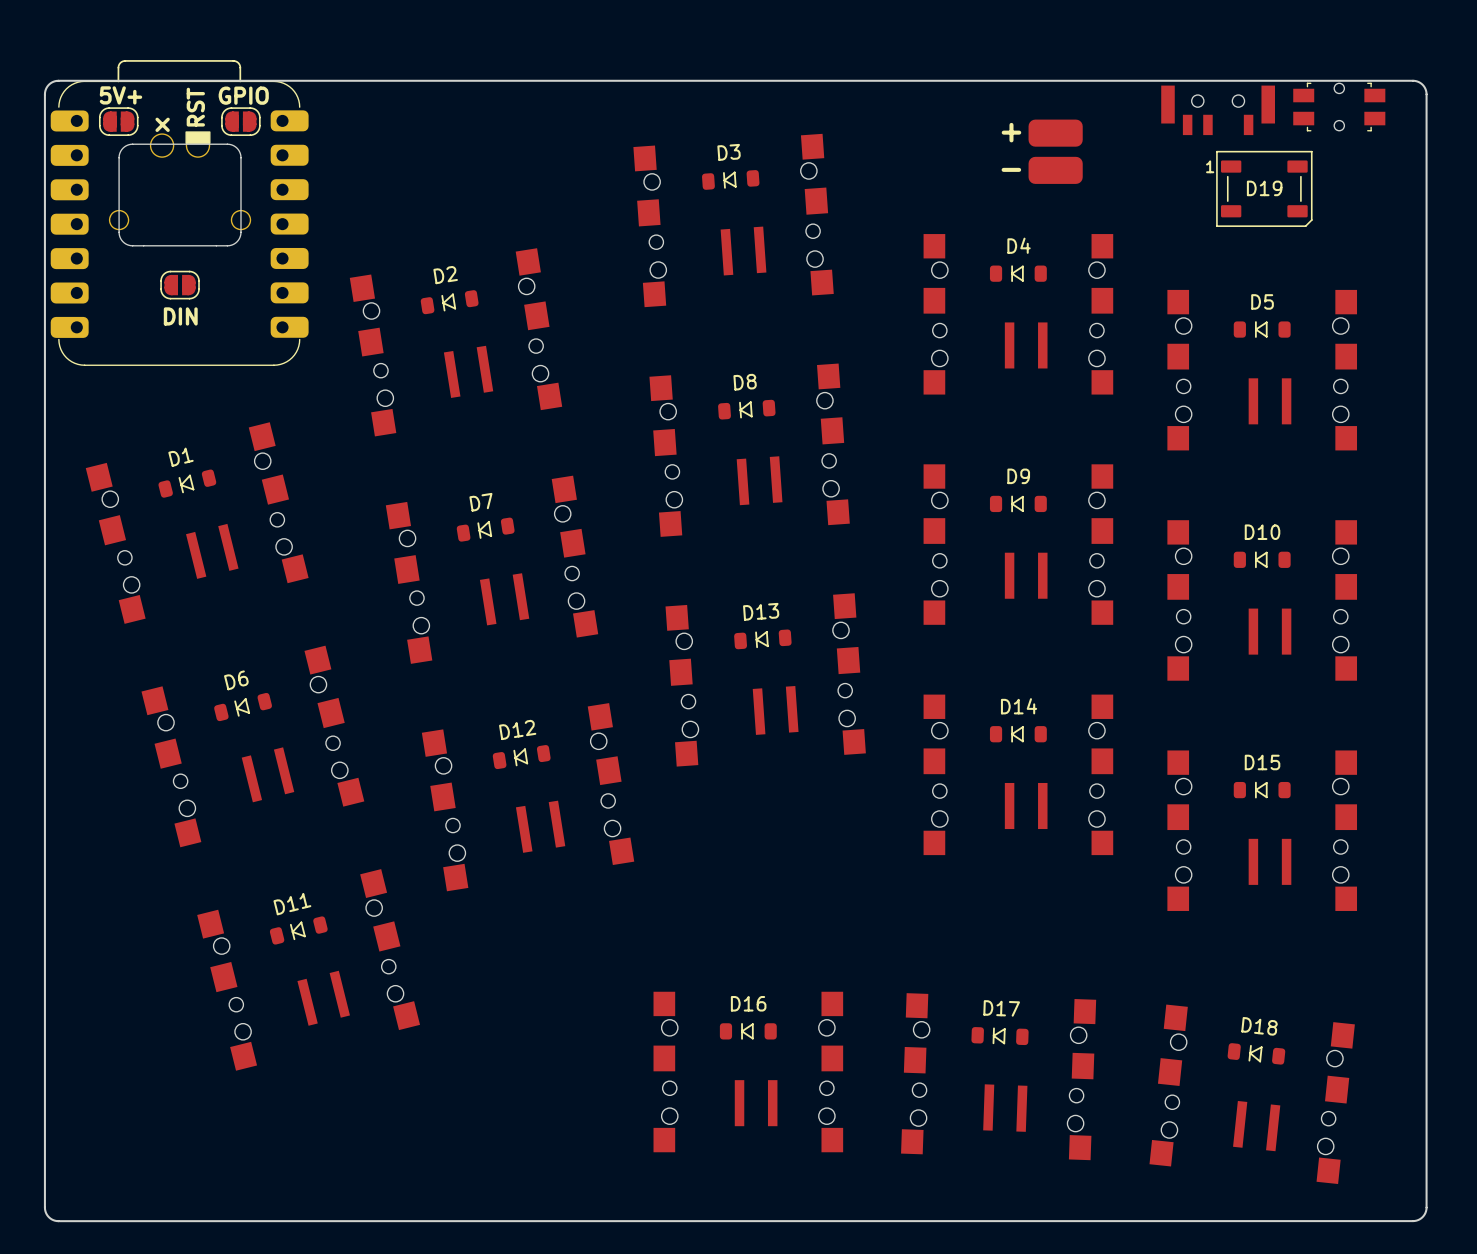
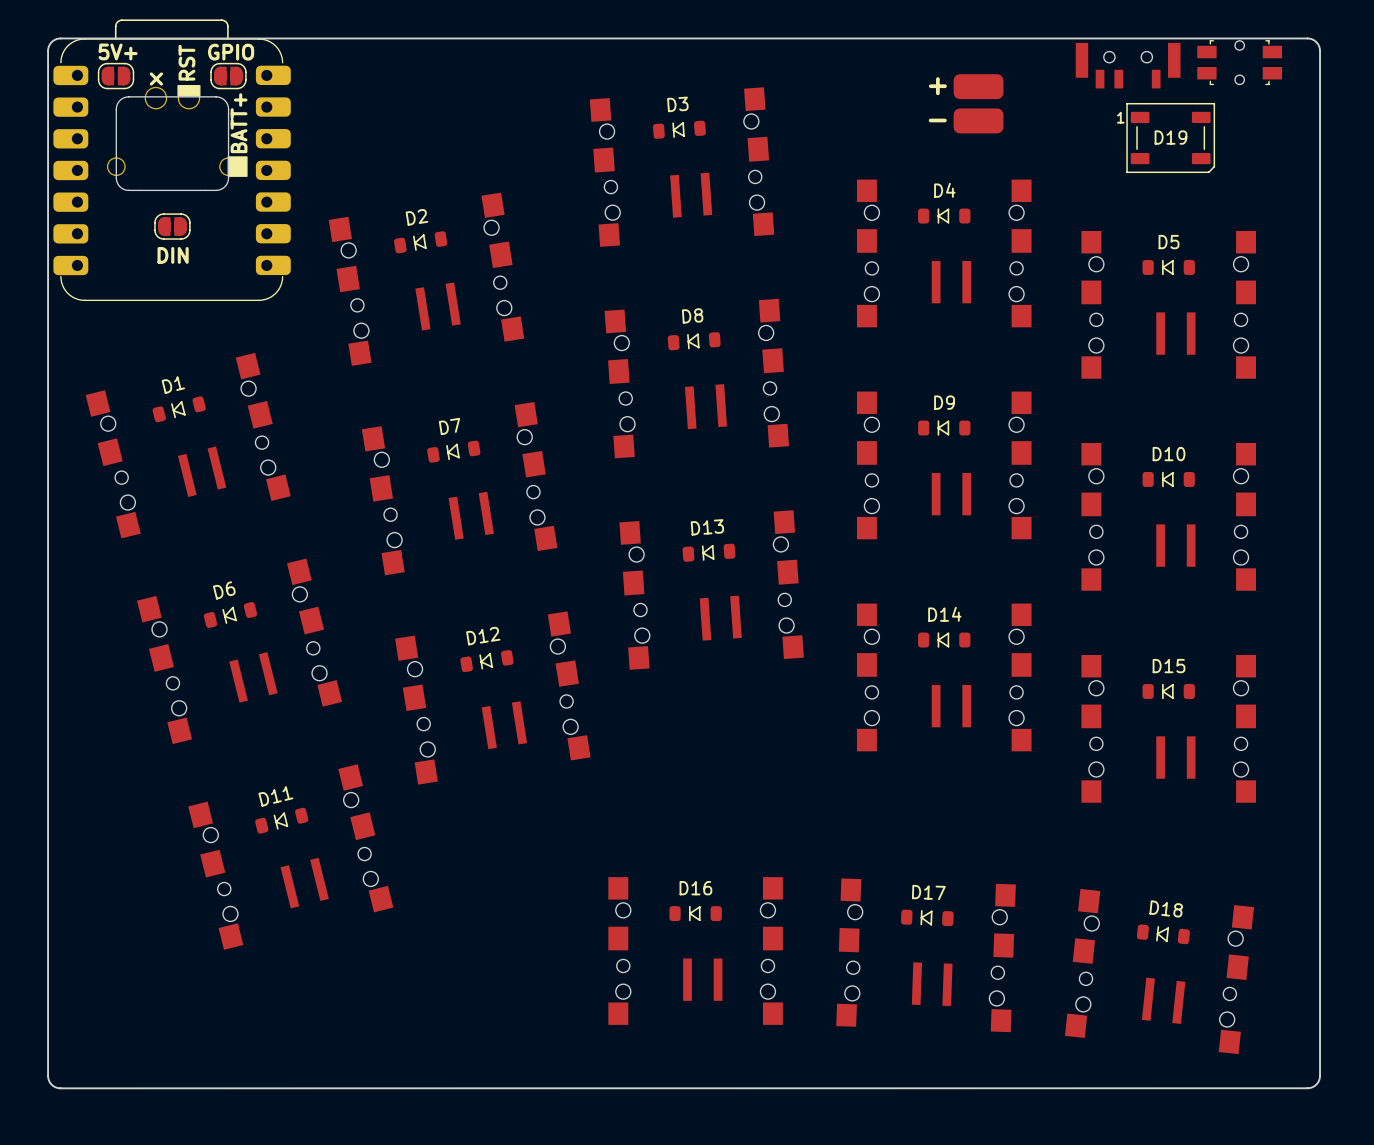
text: none -> BATT+ (239, 123)
drawing: none -> [227, 156, 248, 177]

